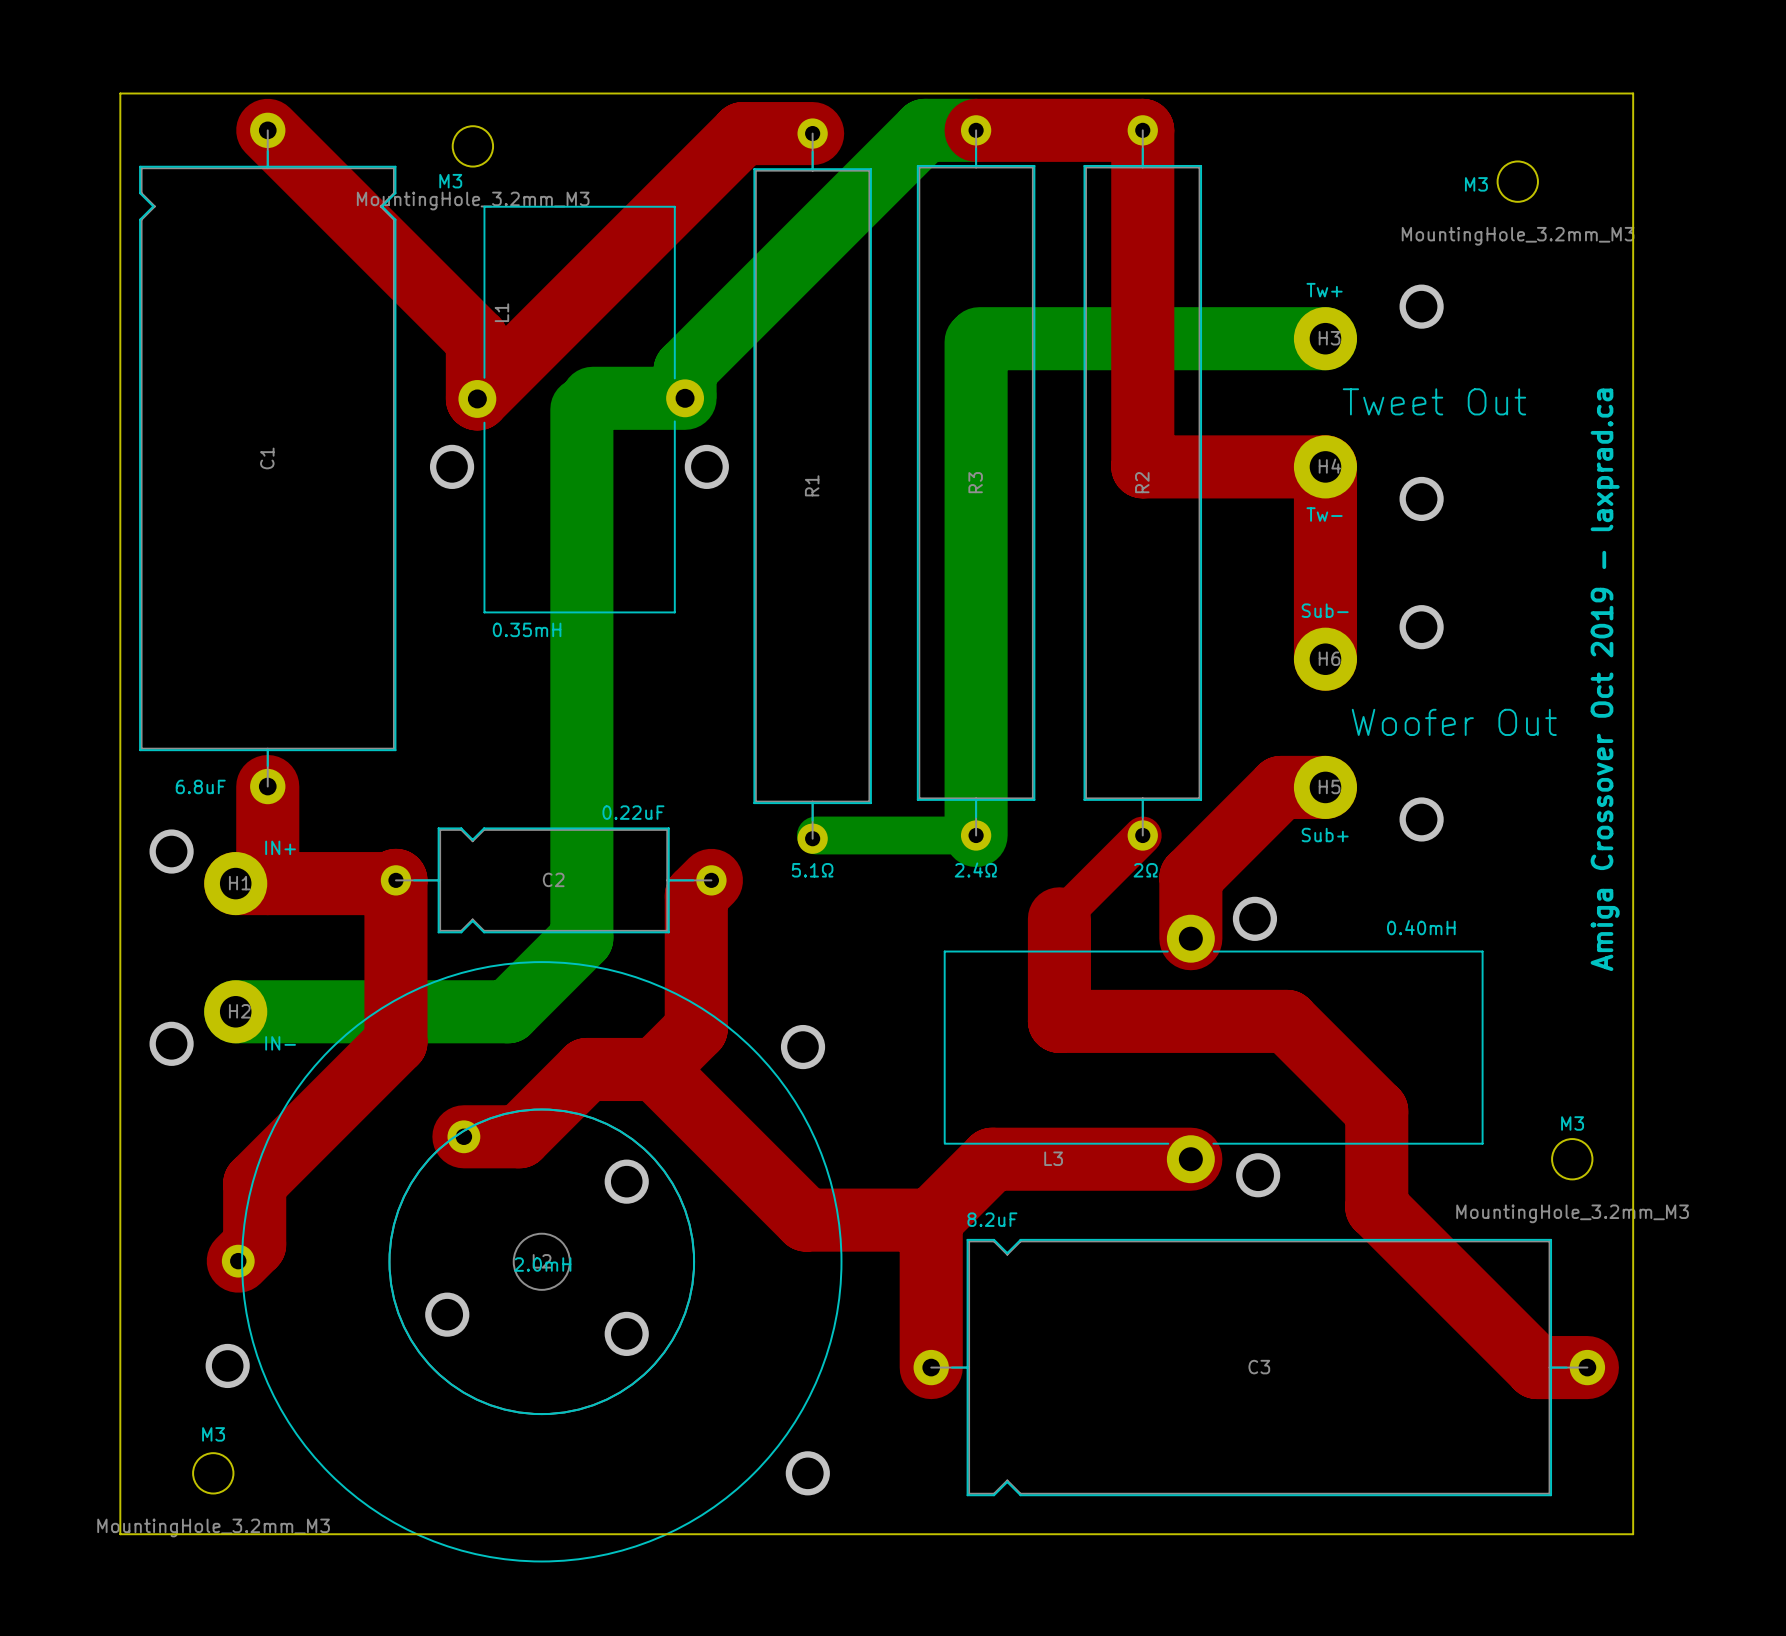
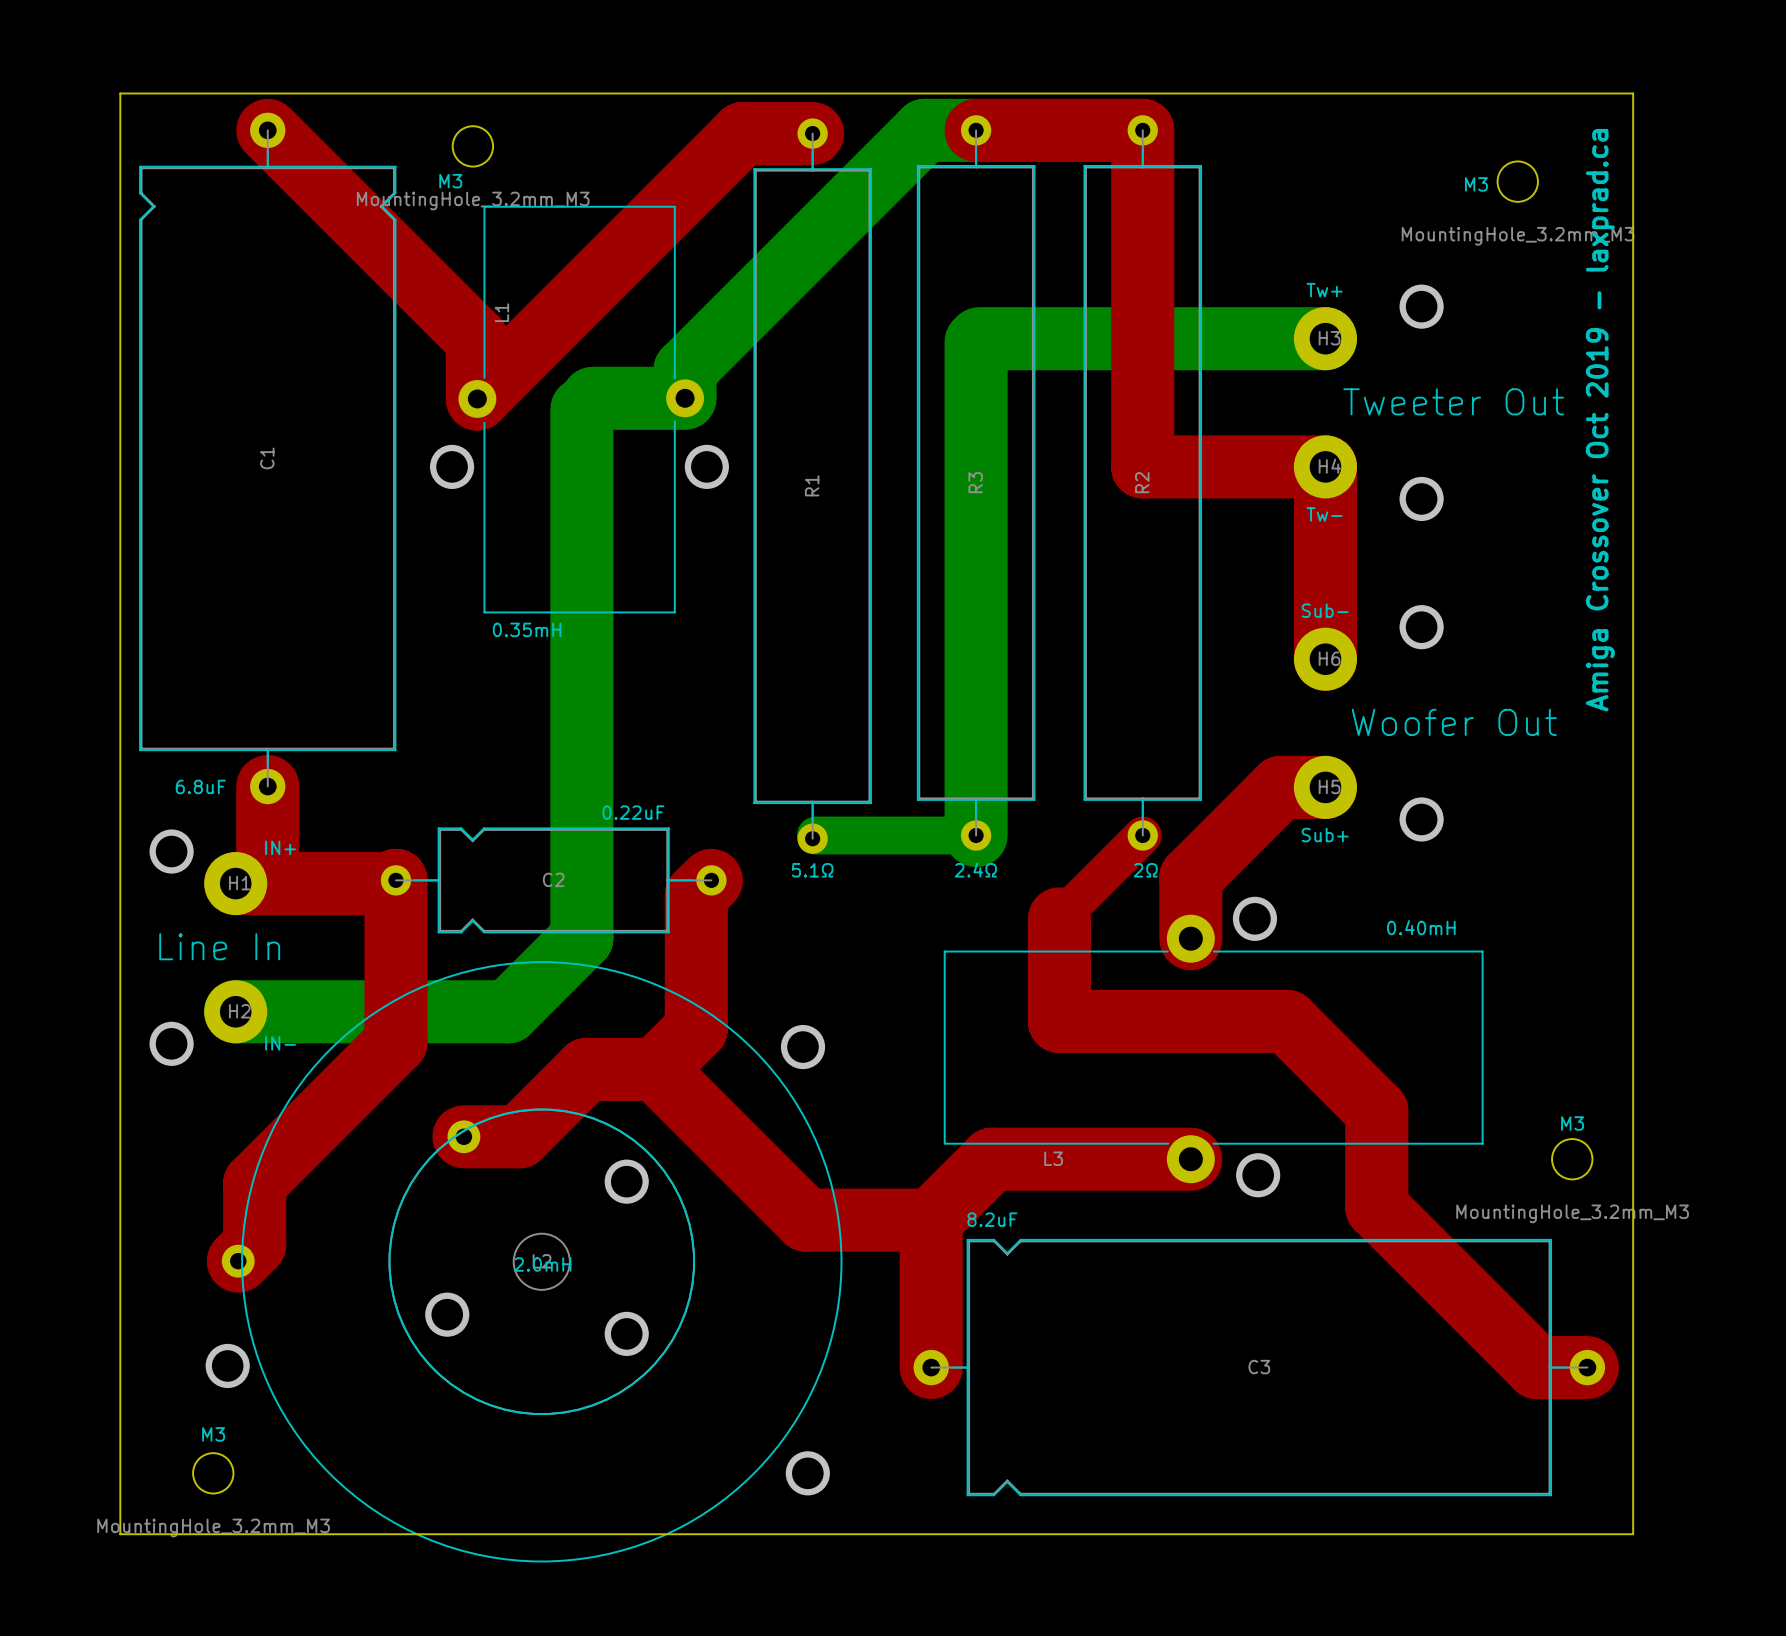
text: Tweet Out (1434, 401) -> Tweeter Out (1453, 401)
text position: Amiga Crossover Oct 2019 - laxprad.ca (1605, 679) -> Amiga Crossover Oct 2019 - laxprad.ca (1600, 420)
text: none -> Line In (219, 946)

